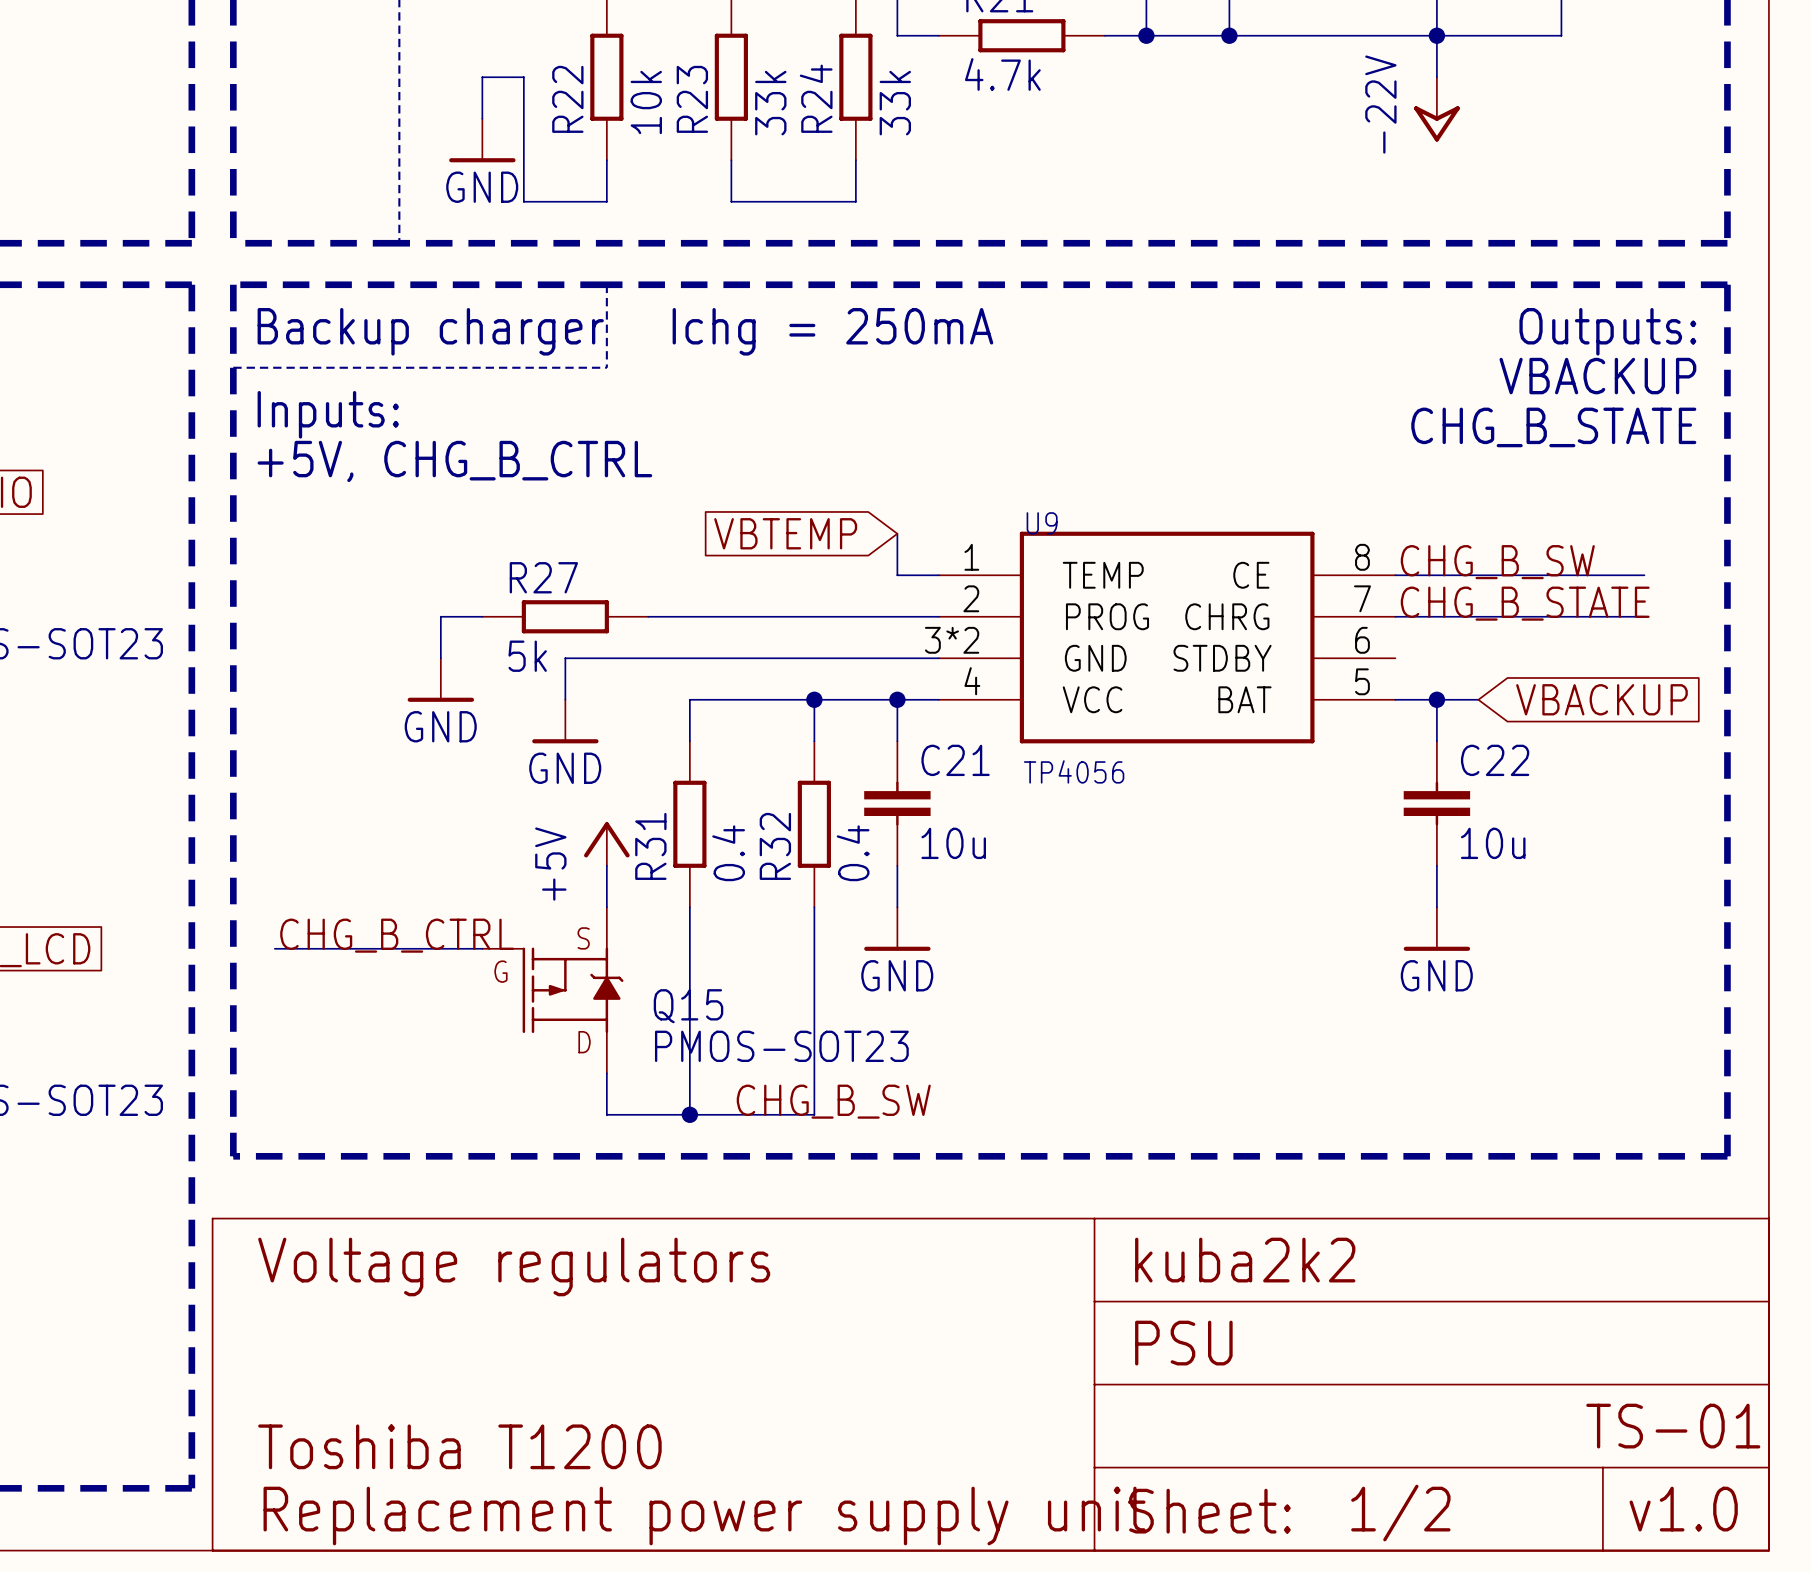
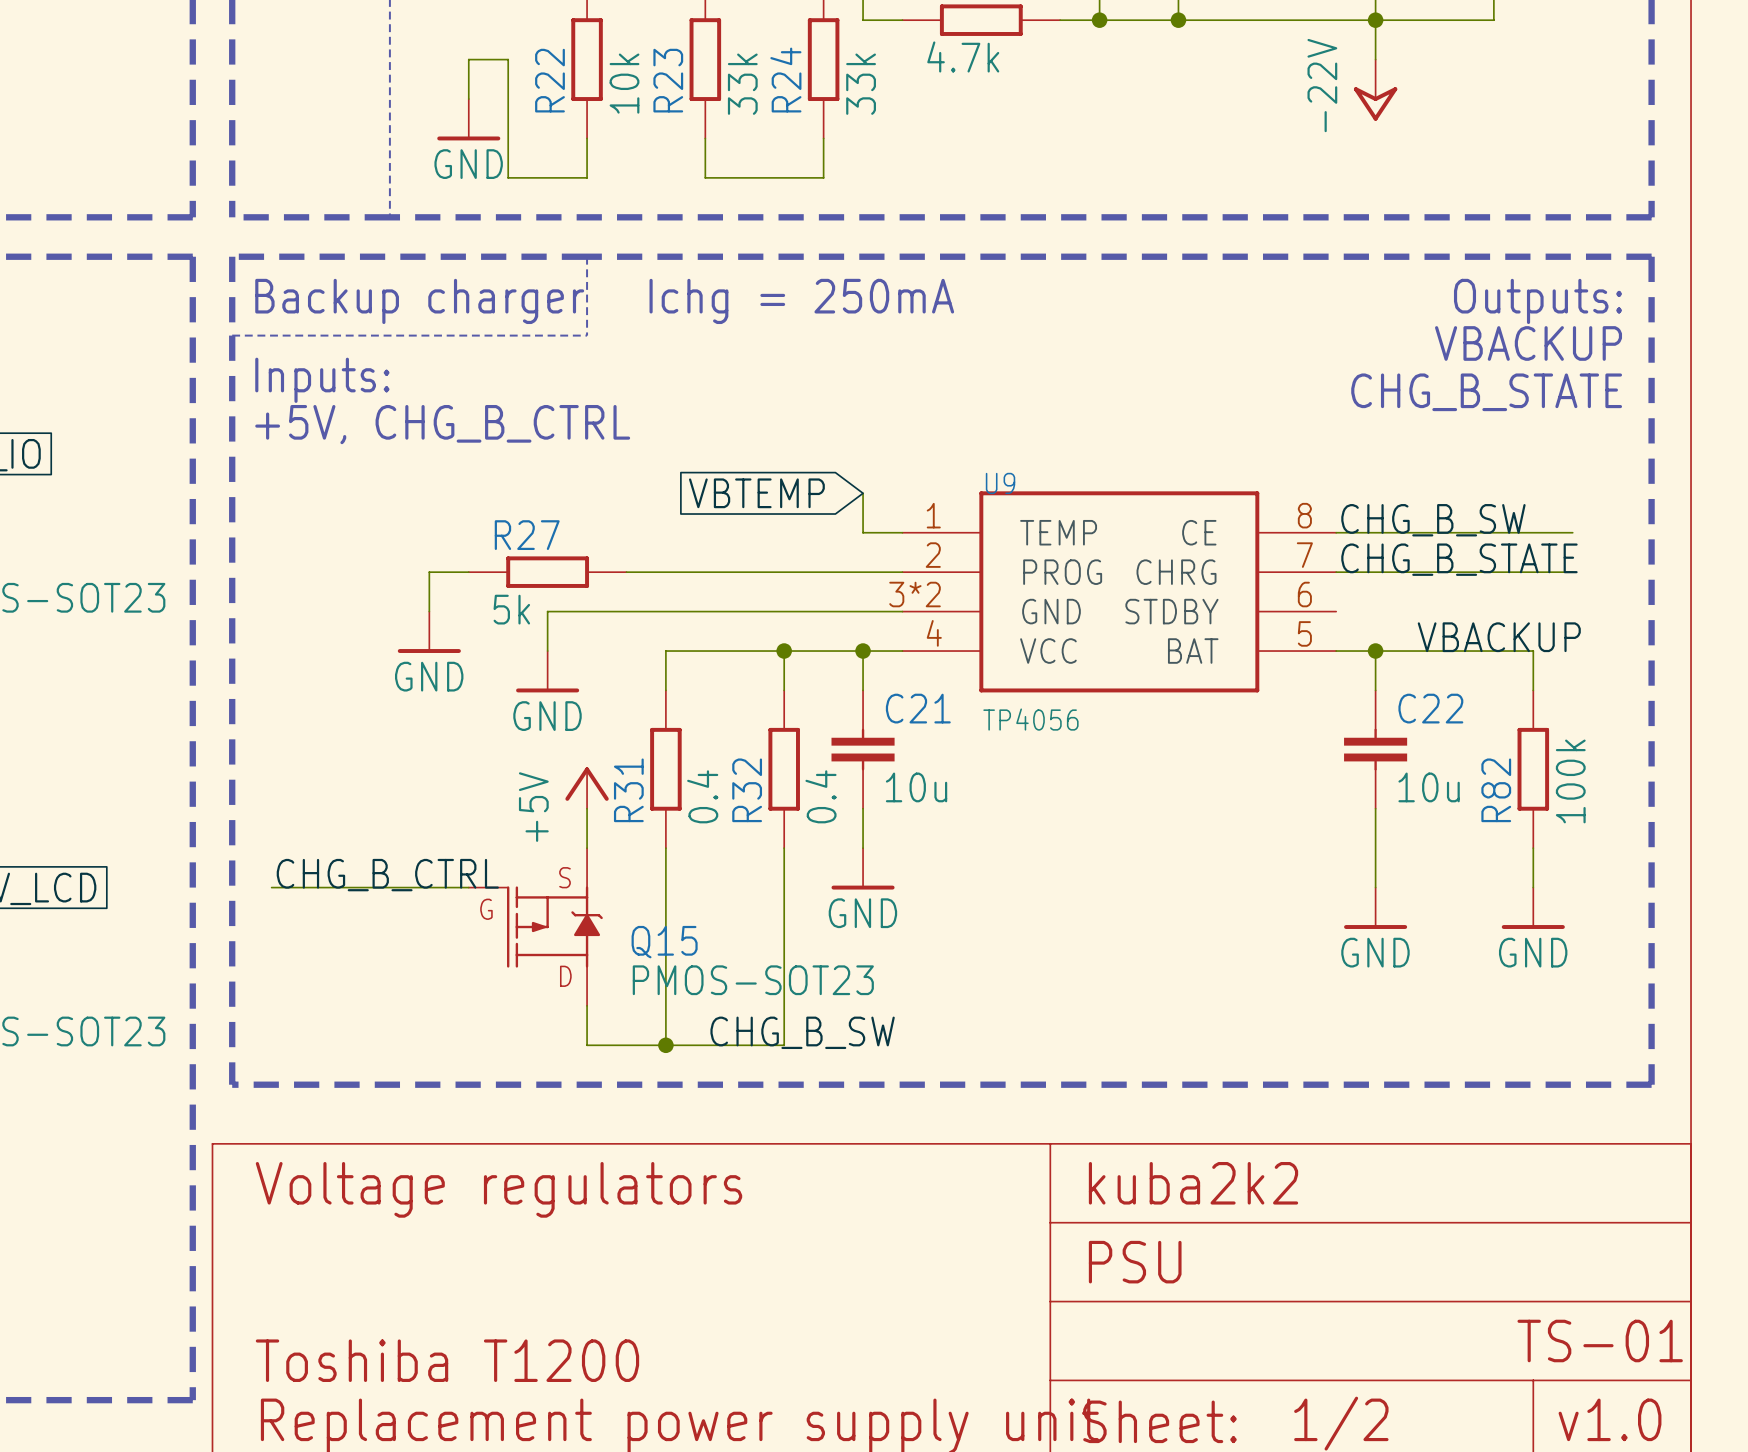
label: none -> VBACKUP (1499, 637)
wire: none -> (1415, 651) (1533, 651) (1533, 690)
global label: VBACKUP (1601, 699) -> none
R82: none -> 100k (1533, 769)
wire: none -> (1533, 848) (1533, 887)
power symbol position: GND (1436, 929) -> GND (1375, 908)
power symbol: none -> GND (1533, 908)

